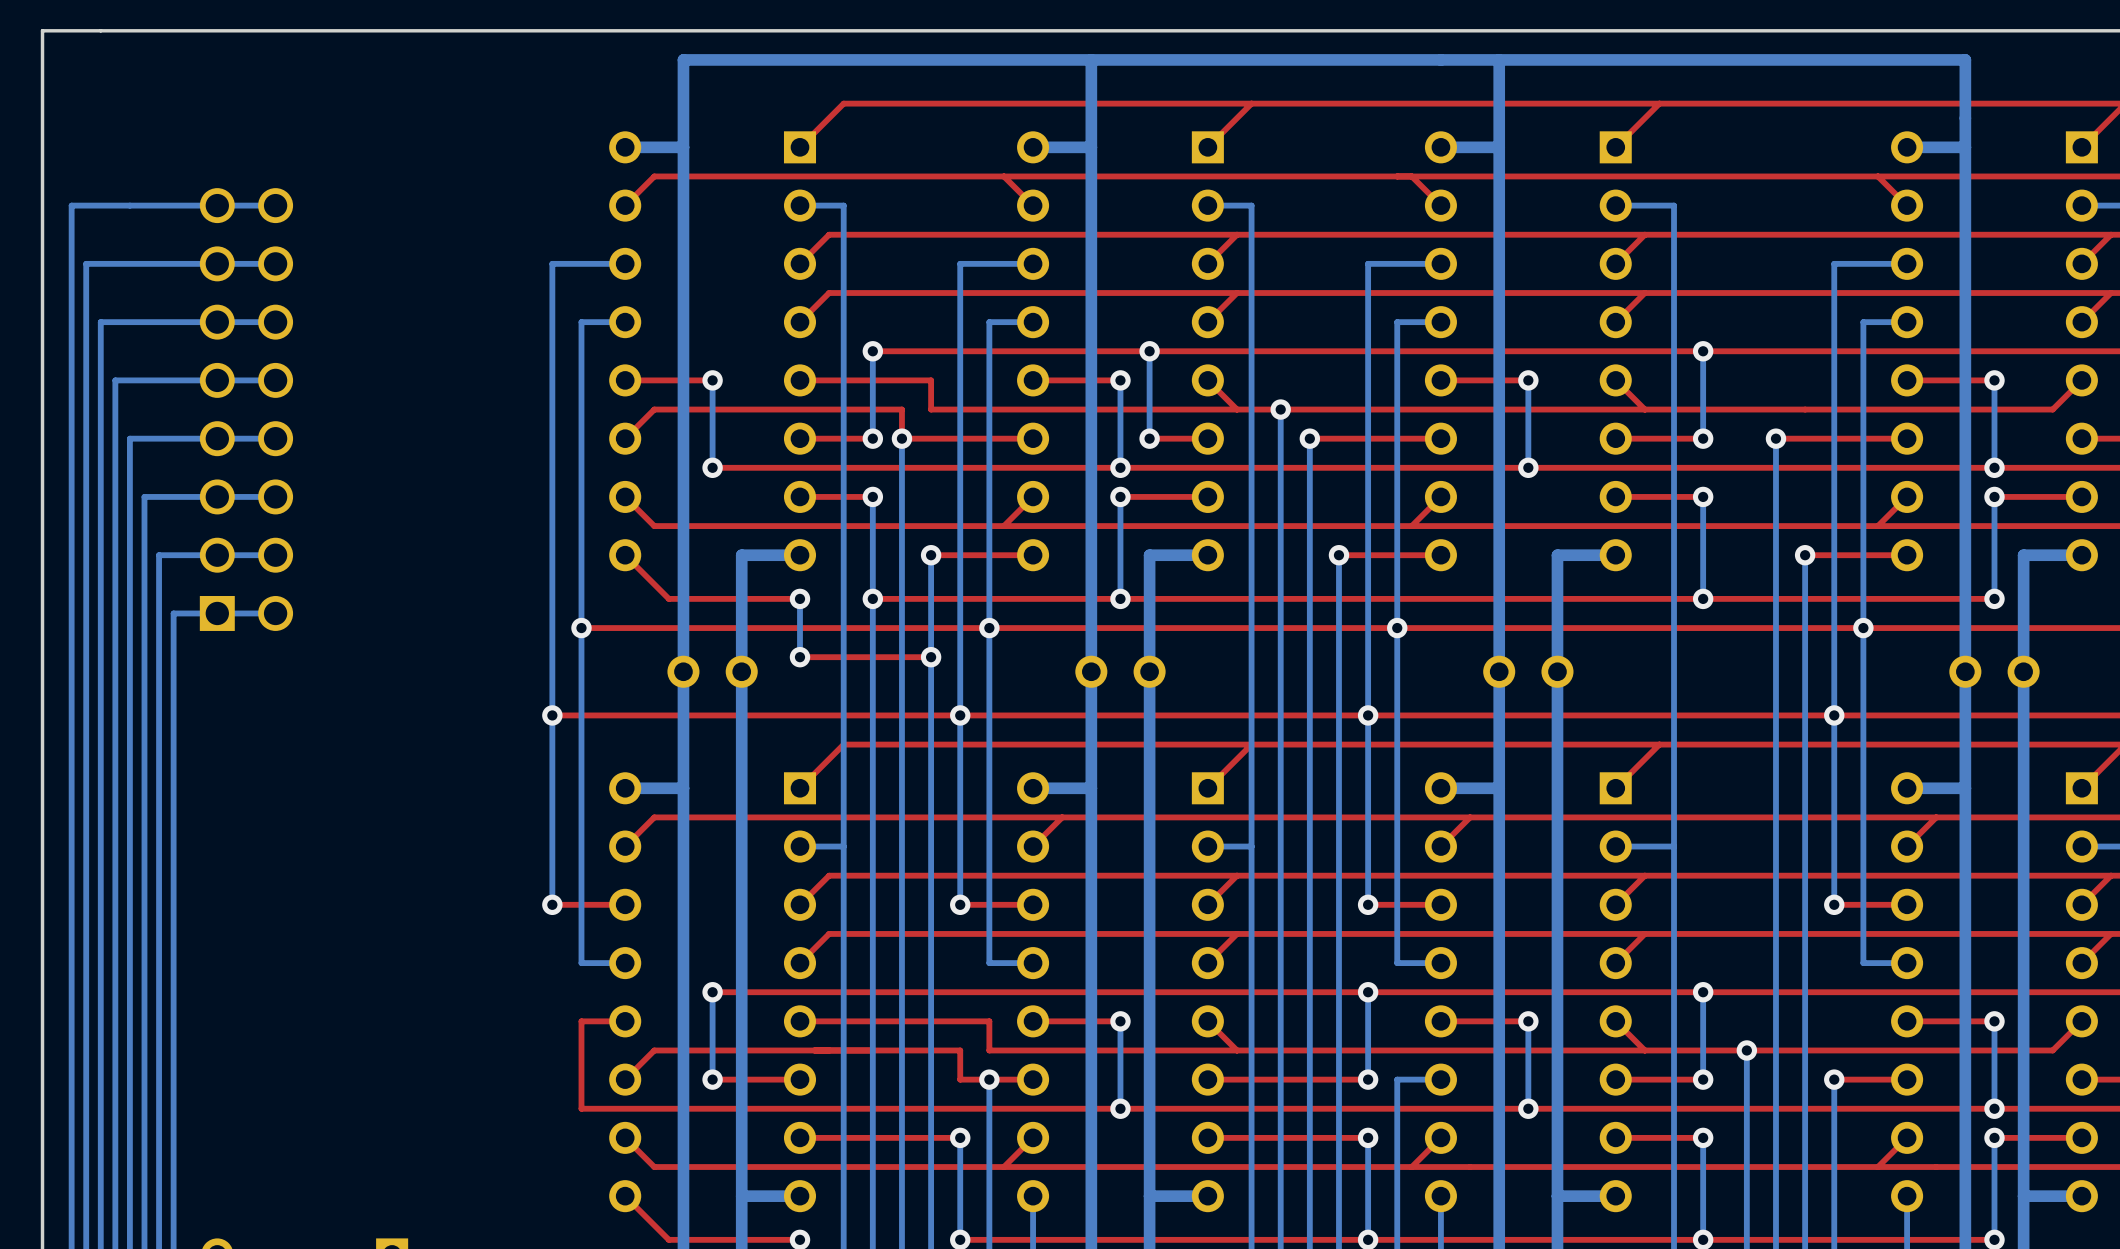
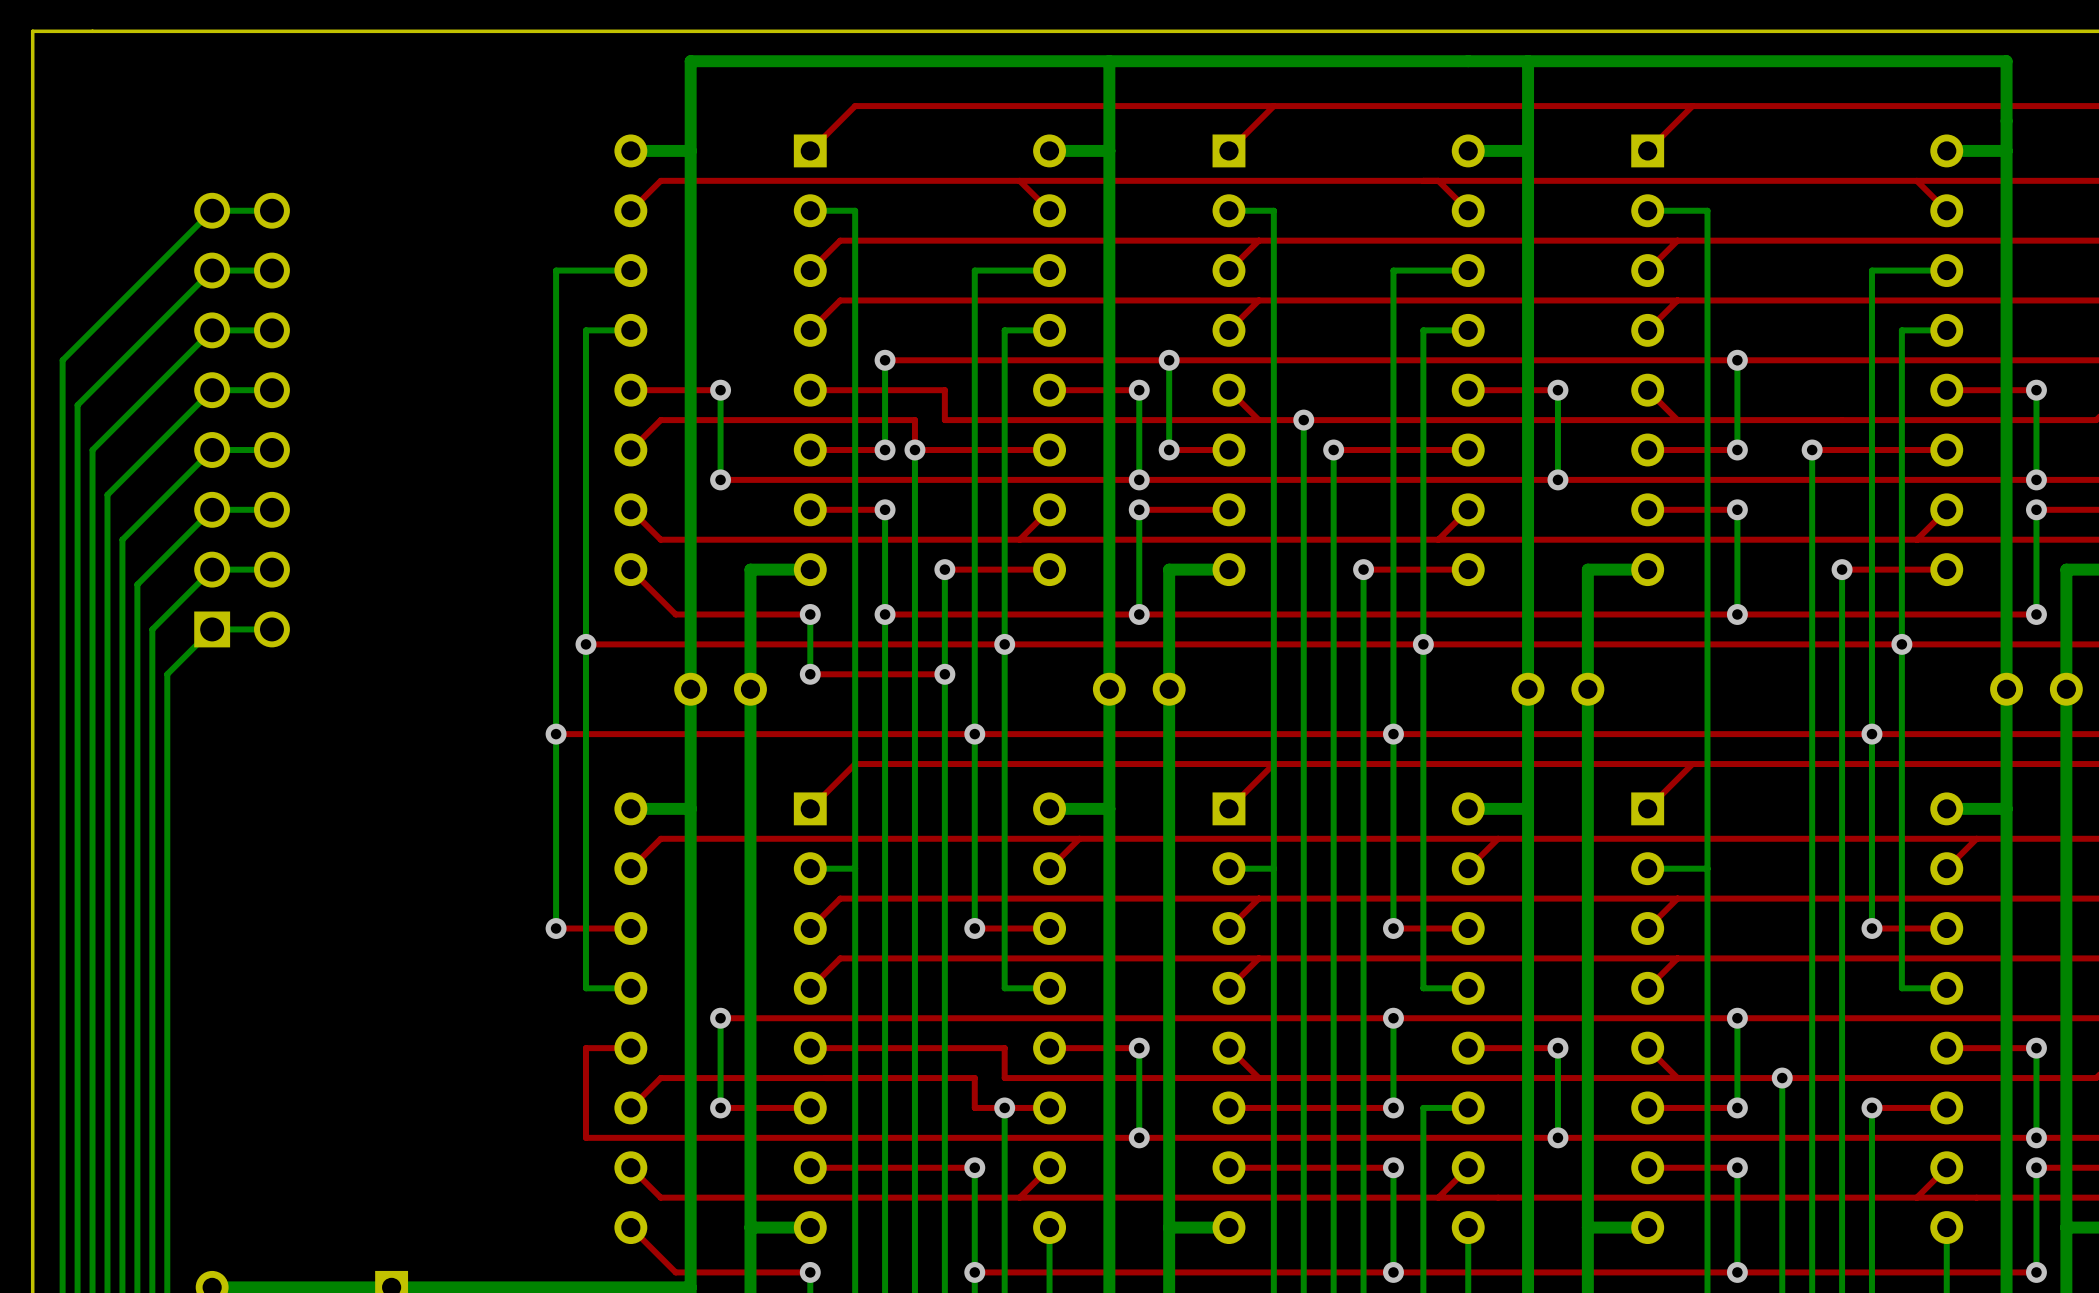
bottom track: (217, 205) (71, 205) (71, 351) -> (212, 210) (62, 360)
bottom track: (217, 263) (86, 263) (86, 394) -> (212, 270) (77, 405)
bottom track: (217, 322) (100, 322) (100, 438) -> (212, 330) (92, 449)
bottom track: (217, 380) (115, 380) (115, 482) -> (212, 390) (107, 494)
bottom track: (217, 438) (129, 438) (129, 526) -> (212, 449) (122, 539)
bottom track: (217, 496) (144, 496) (144, 569) -> (212, 509) (137, 584)
bottom track: (217, 555) (159, 555) (159, 613) -> (212, 569) (152, 629)
bottom track: (217, 613) (173, 613) (173, 657) -> (212, 629) (167, 674)

